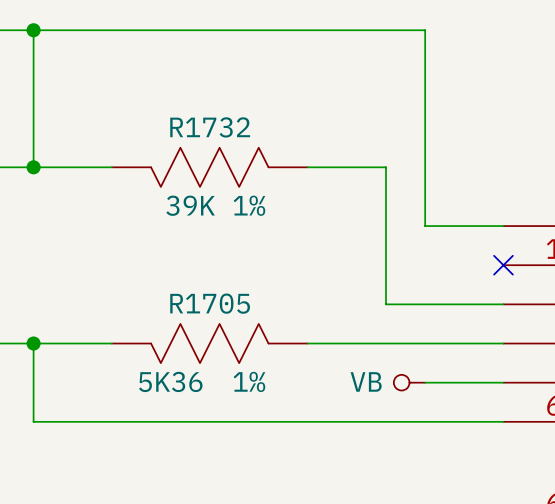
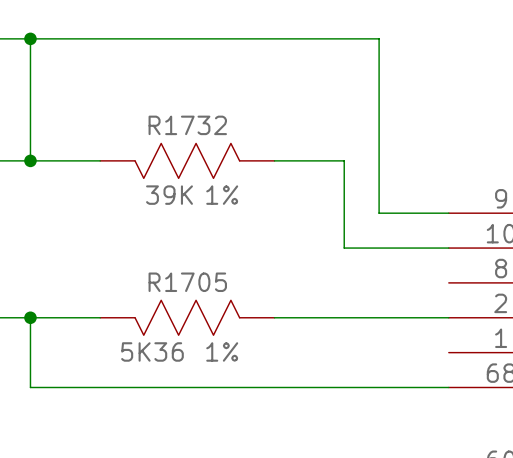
wire: (386, 265) (386, 304) (503, 304) -> (344, 248) (448, 248)
no-connect mark: (503, 265) -> none
power symbol: VB (409, 382) -> none
wire: (425, 382) (503, 382) -> none

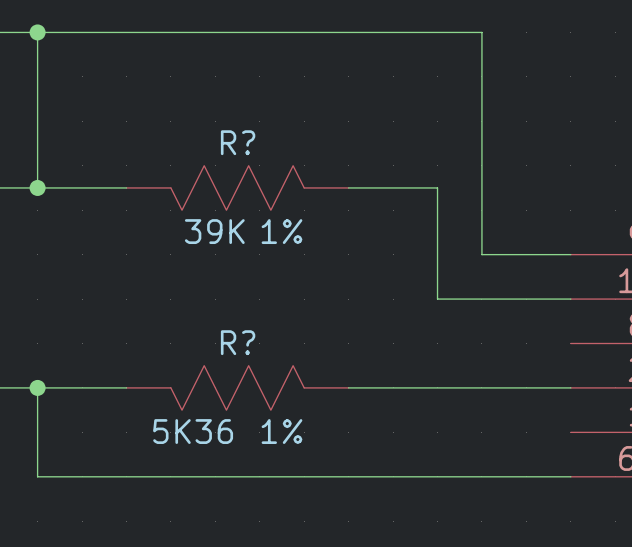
R1732 name: R1732 (187, 125) -> R? (238, 142)
R1705 name: R1705 (187, 282) -> R? (238, 342)

